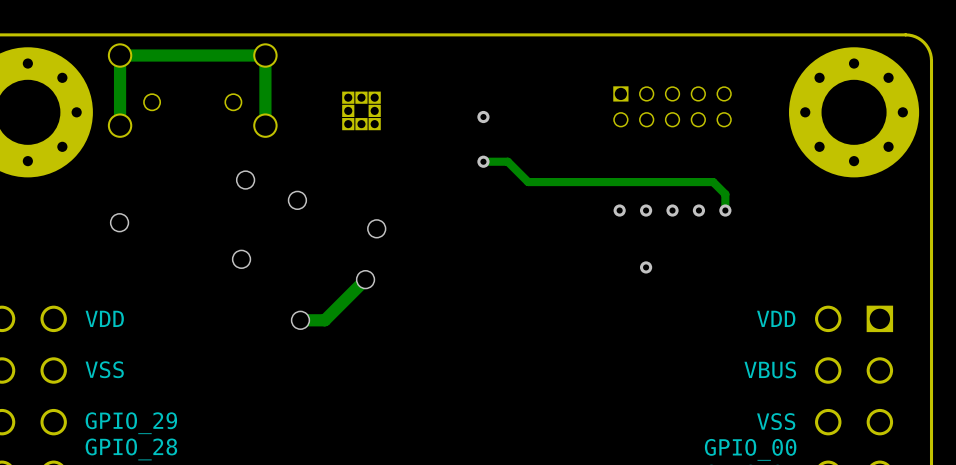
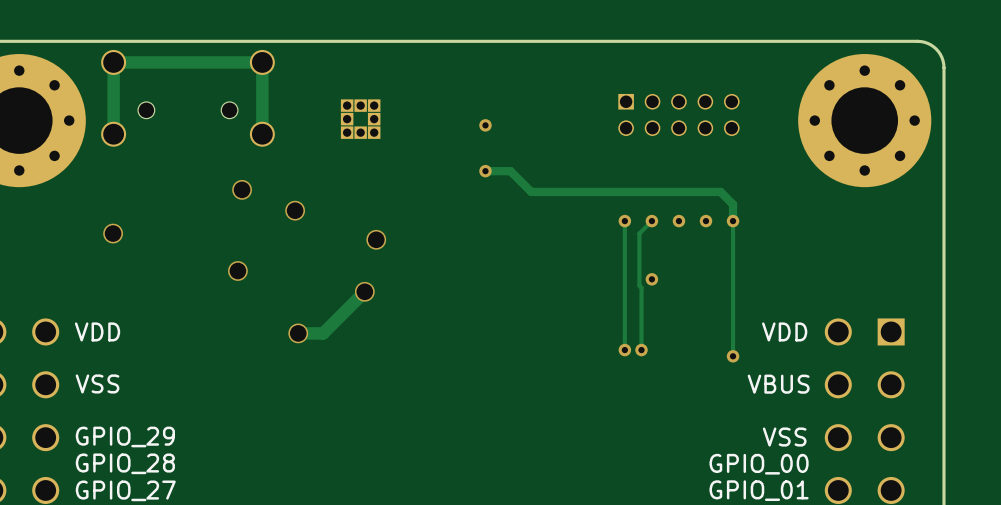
track: none -> (624, 221) (624, 350)
track: none -> (651, 221) (639, 233) (641, 350)
track: none -> (733, 221) (733, 356)
via: none -> (624, 350)
via: none -> (641, 350)
via: none -> (733, 356)

